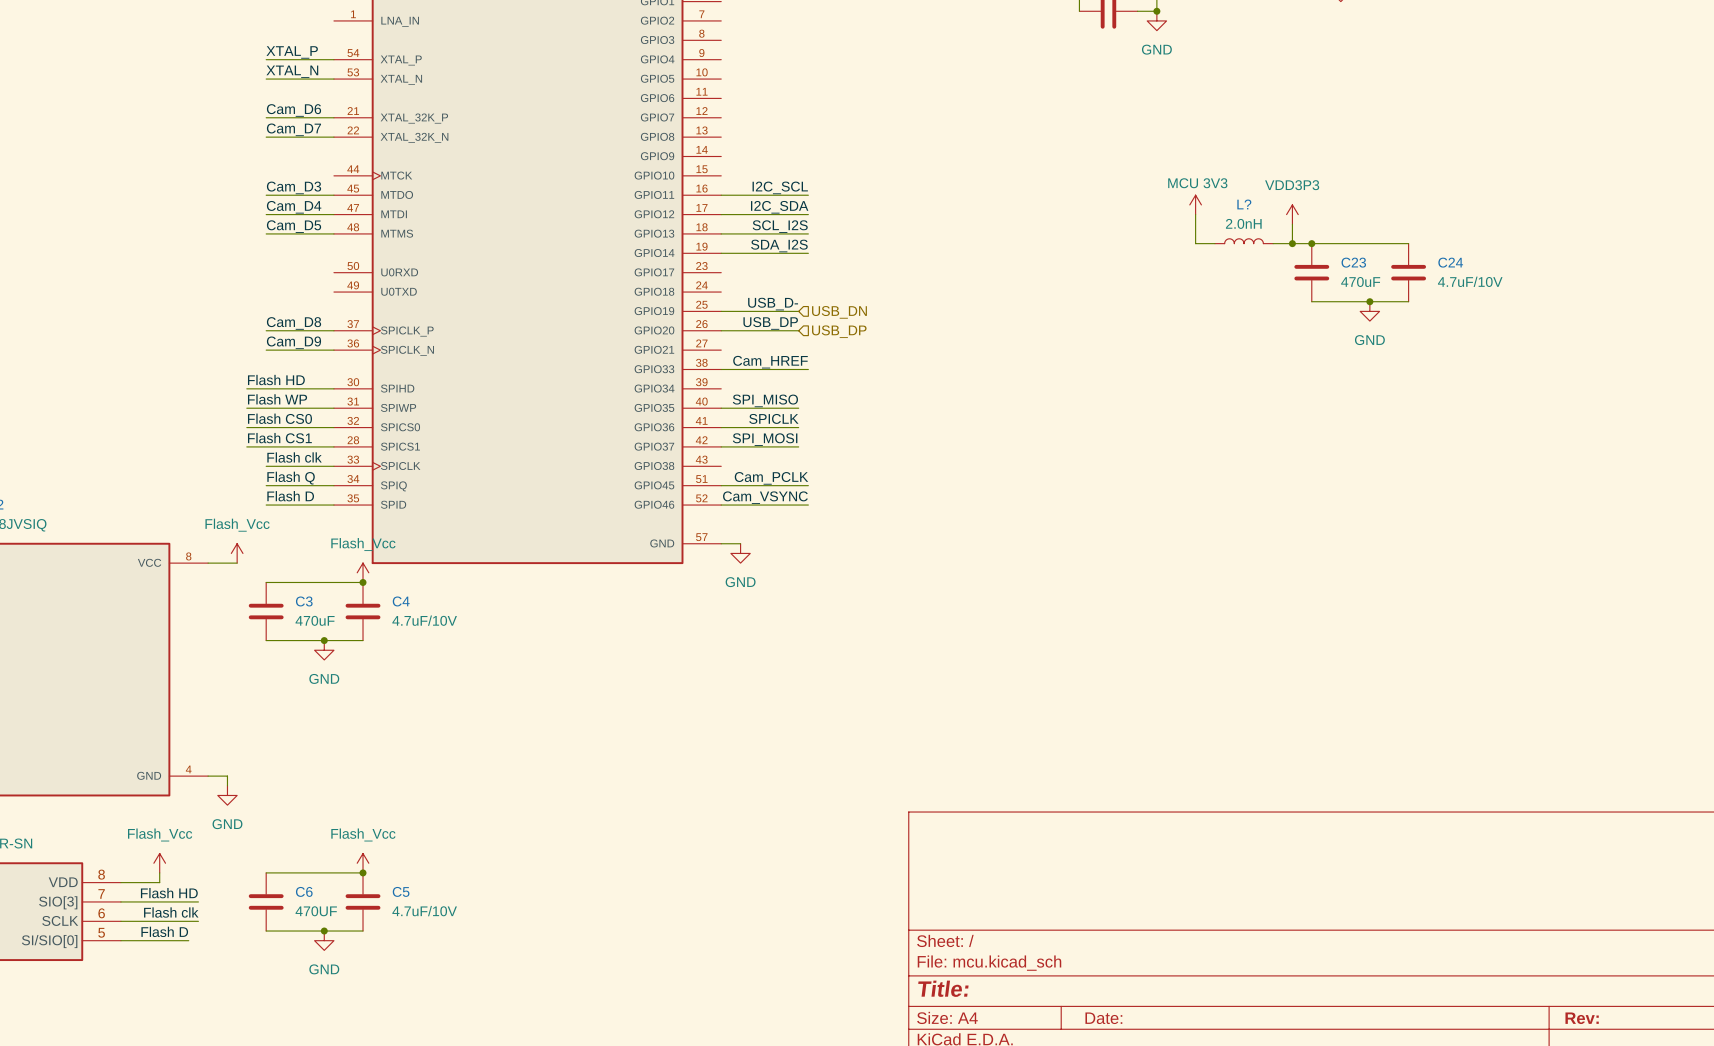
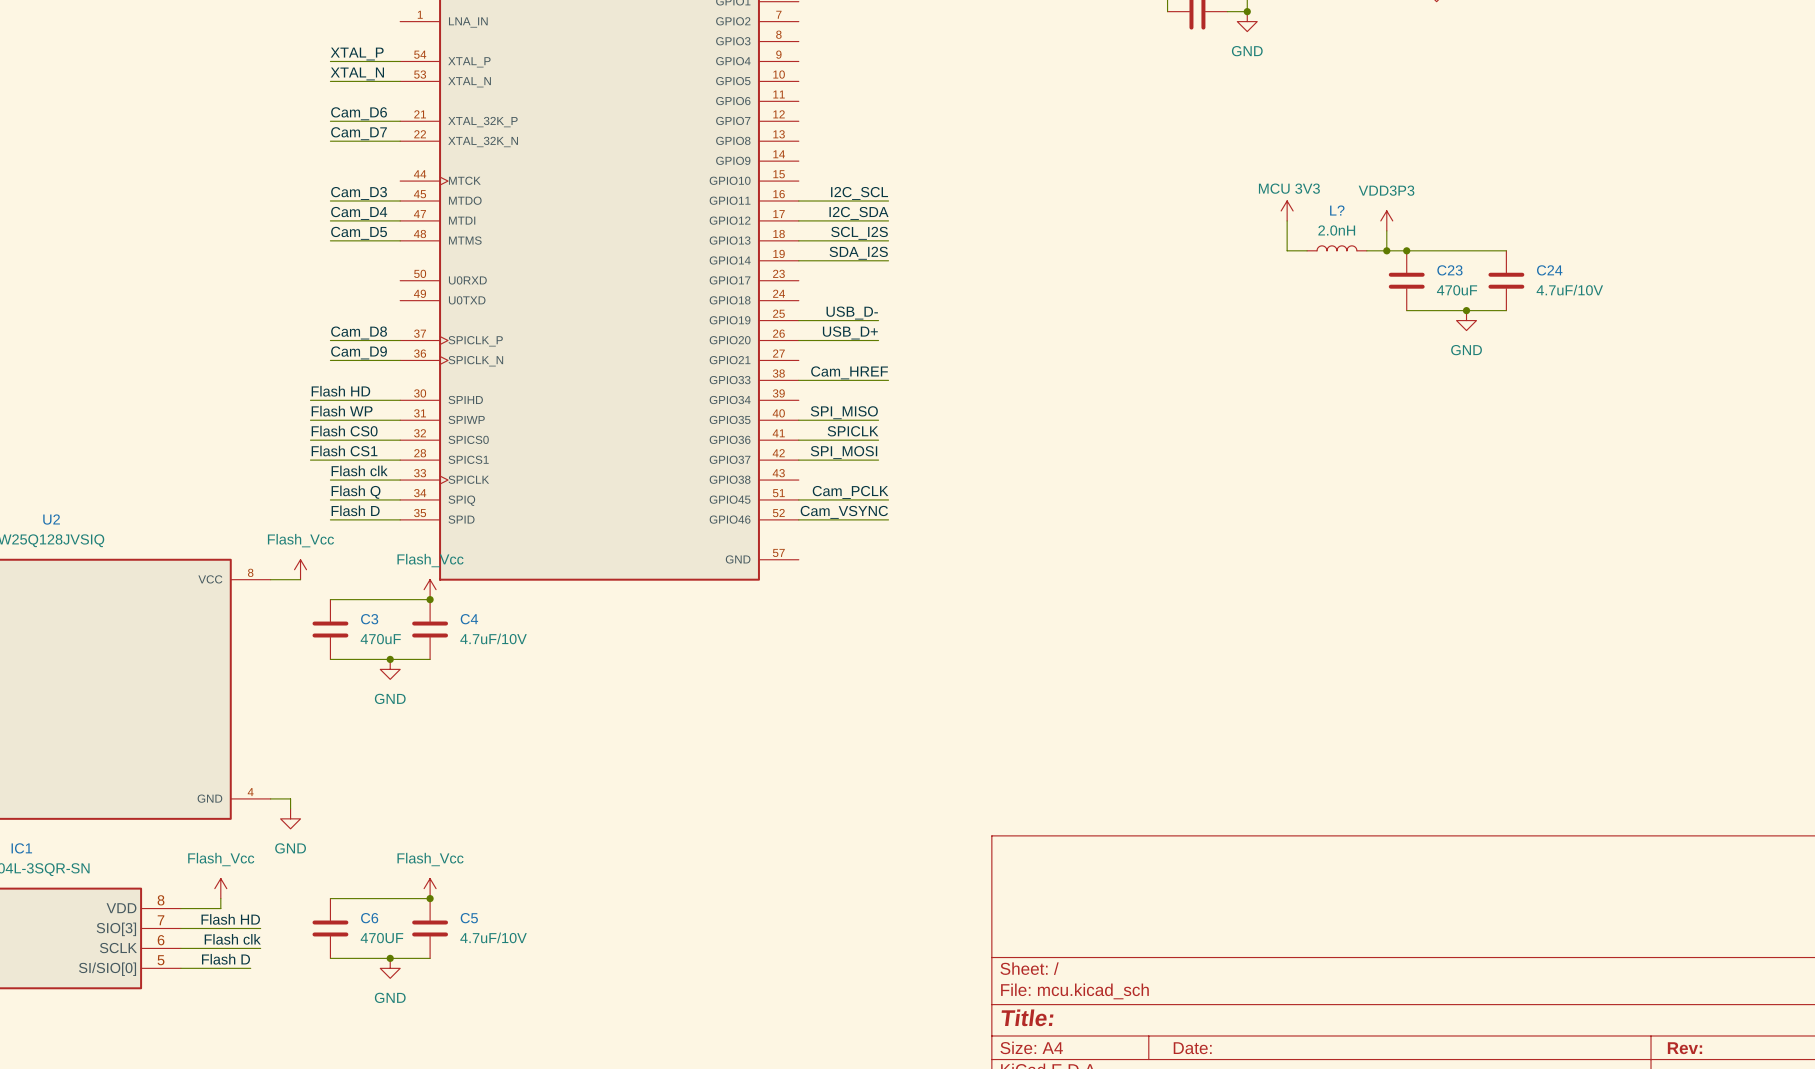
hierarchical label: USB_DN (839, 312) -> none
label: USB_DP (770, 323) -> USB_D+ (850, 332)
hierarchical label: USB_DP (839, 331) -> none
wire: (721, 543) (740, 543) -> none
power symbol: GND (740, 553) -> none

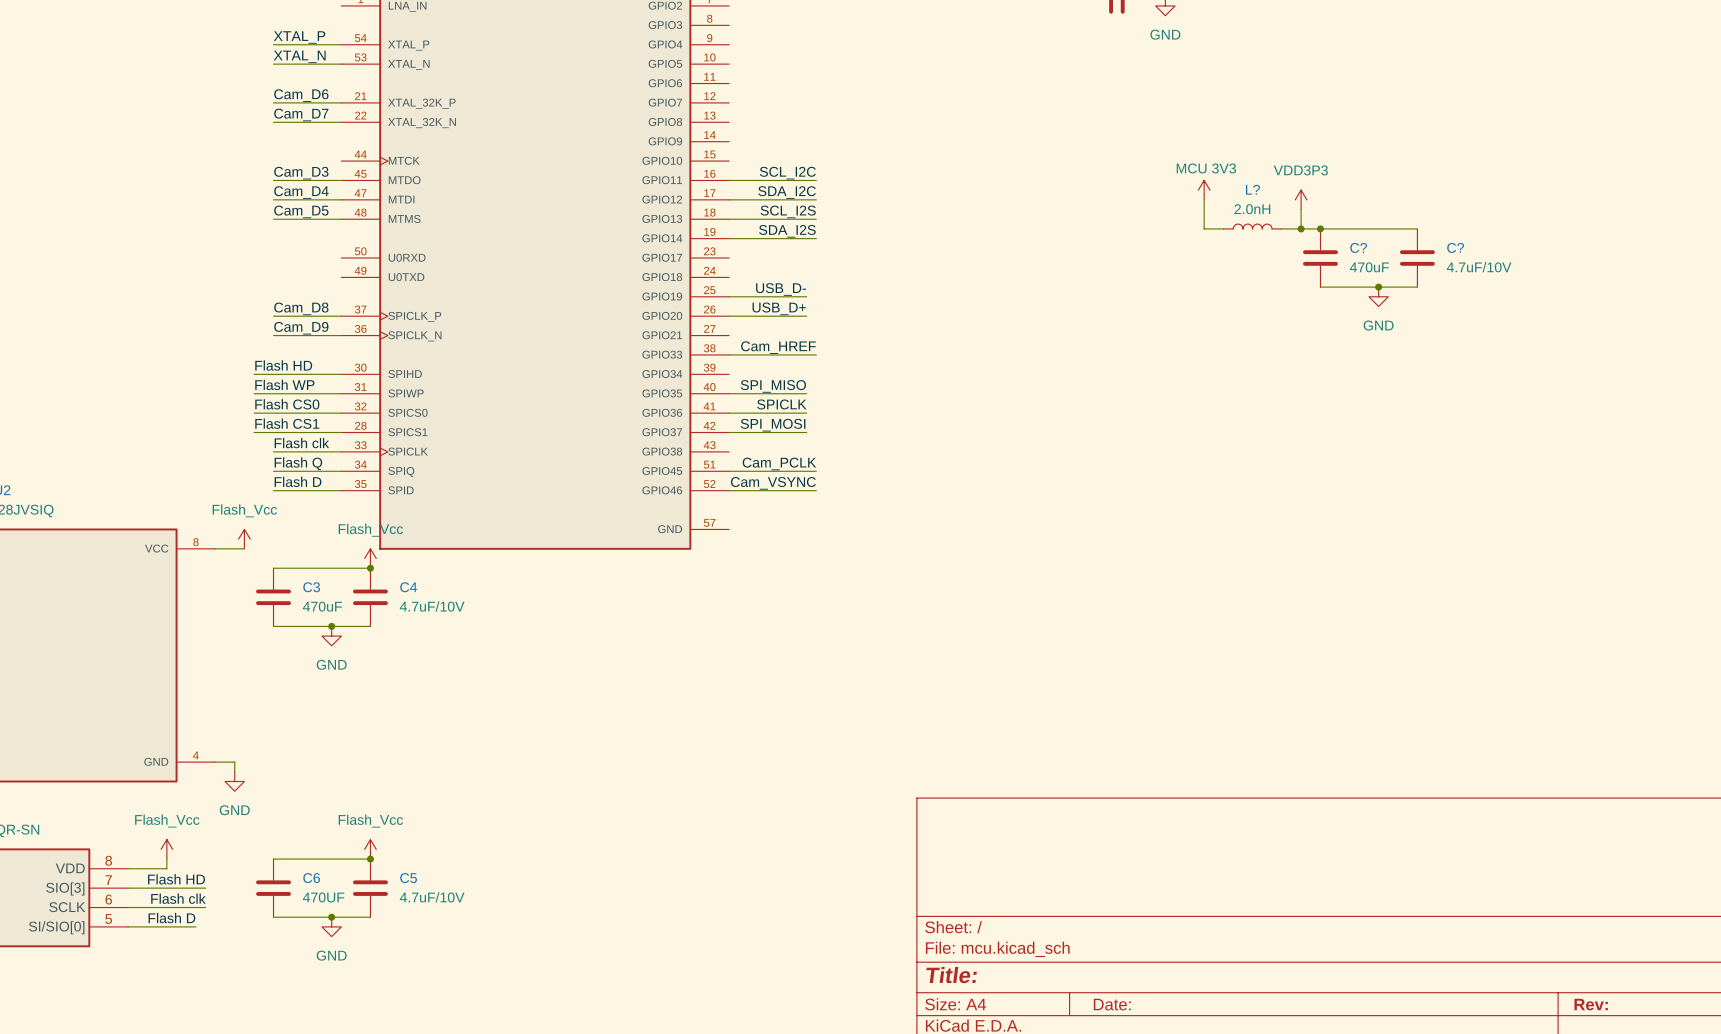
label: I2C_SCL (859, 193) -> SCL_I2C (787, 173)
label: I2C_SDA (858, 213) -> SDA_I2C (787, 192)
C23 name: C23 (1449, 270) -> C? (1358, 247)
C24 name: C24 (1549, 270) -> C? (1455, 247)

